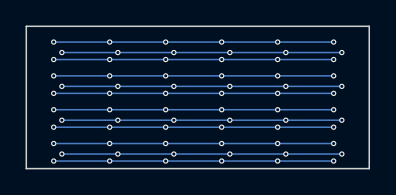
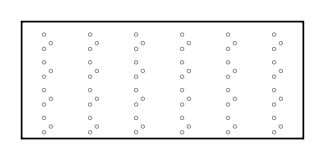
track: (333, 42) (53, 42) -> none
track: (341, 52) (61, 52) -> none
track: (333, 59) (53, 59) -> none
track: (333, 75) (53, 75) -> none
track: (341, 86) (61, 86) -> none
track: (333, 93) (53, 93) -> none
track: (333, 109) (53, 109) -> none
track: (341, 120) (61, 120) -> none
track: (333, 127) (53, 127) -> none
track: (333, 143) (53, 143) -> none
track: (341, 154) (61, 154) -> none
track: (333, 161) (53, 161) -> none

